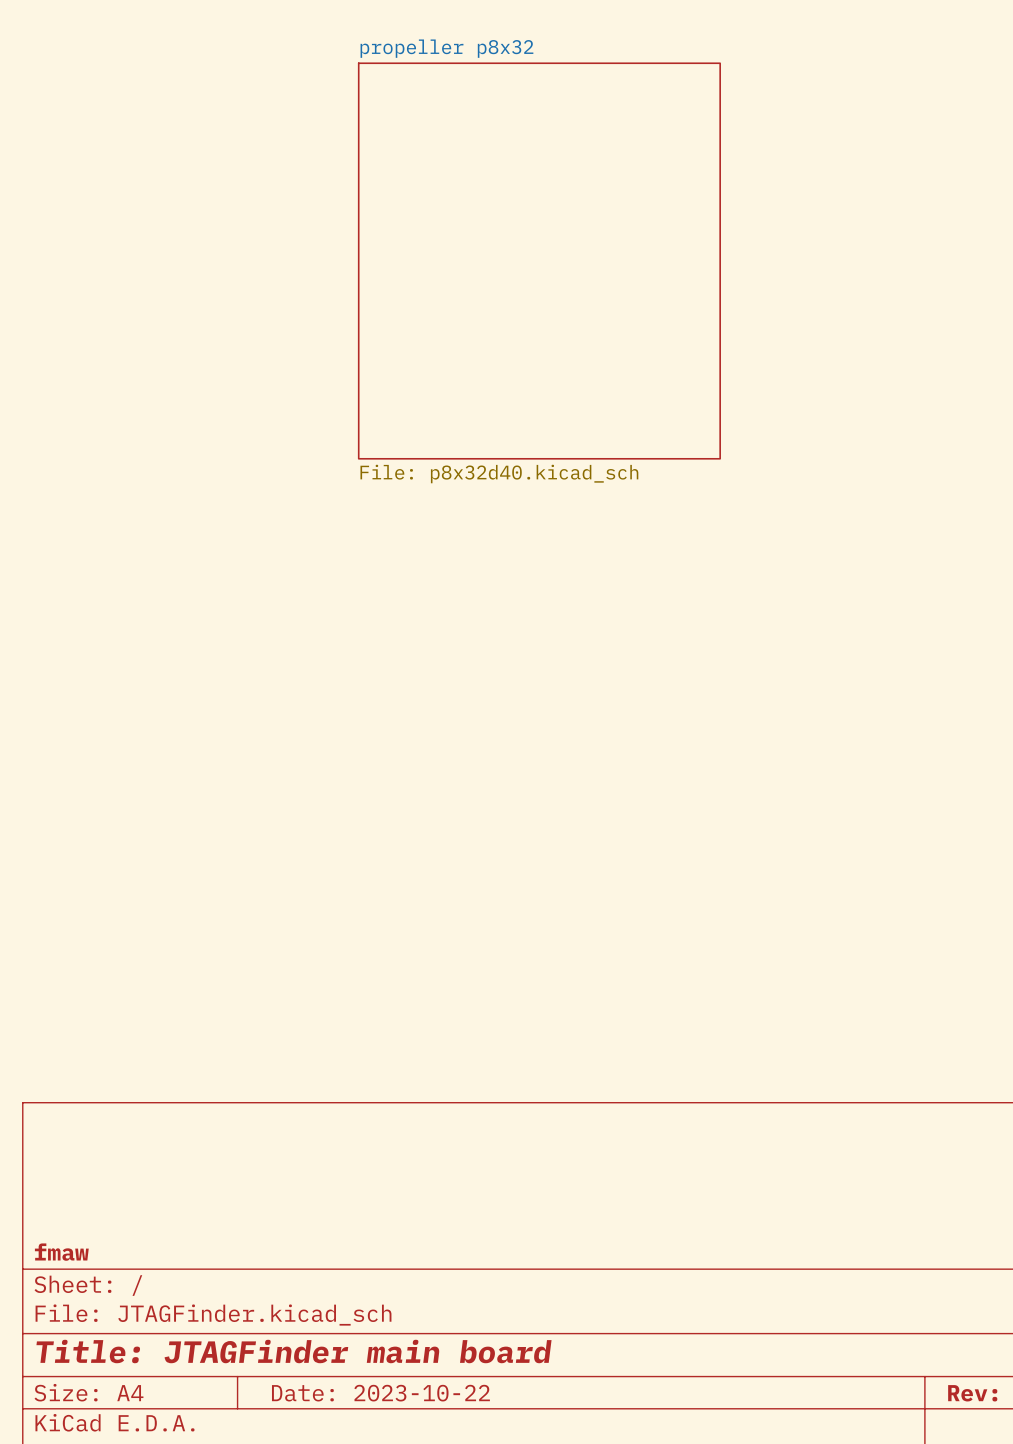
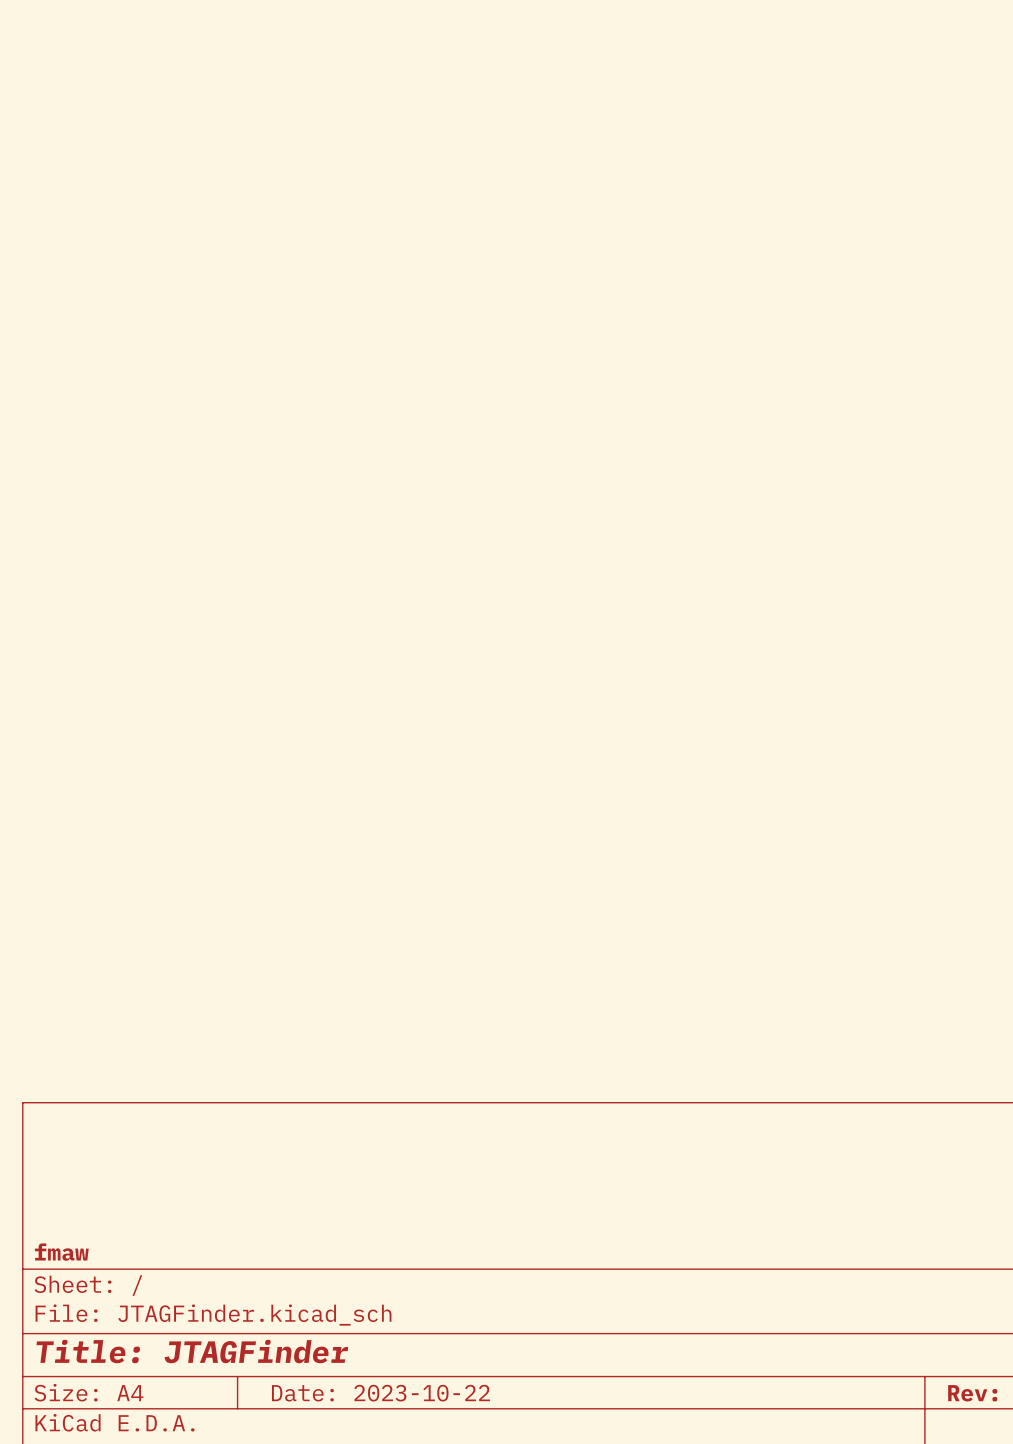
sheet propeller p8x32: File: p8x32d40.kicad_sch (539, 261) -> none
title block: Title: JTAGFinder main board (294, 1351) -> Title: JTAGFinder (192, 1351)

